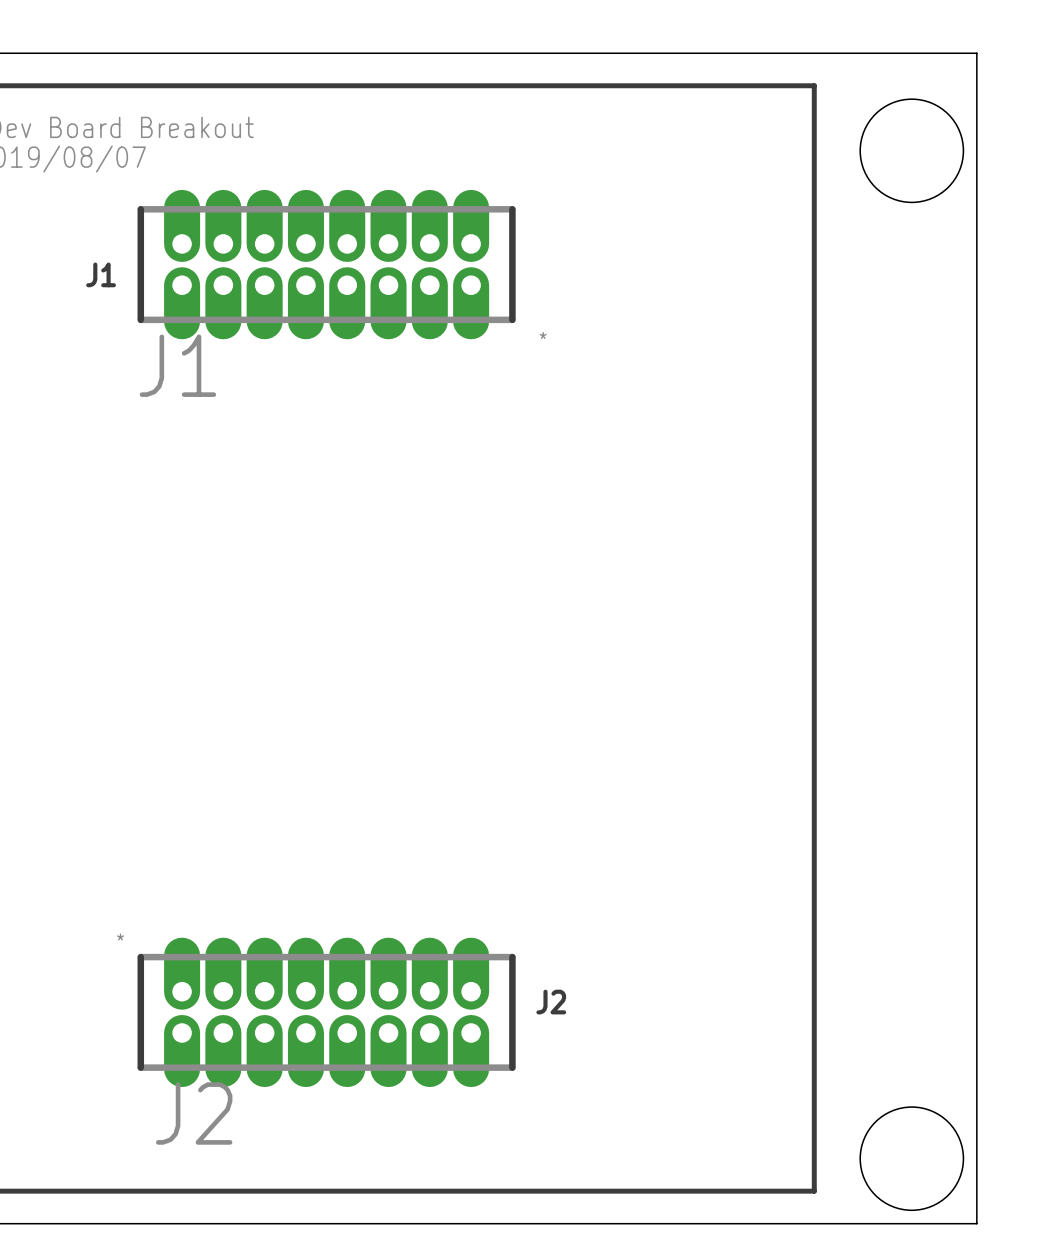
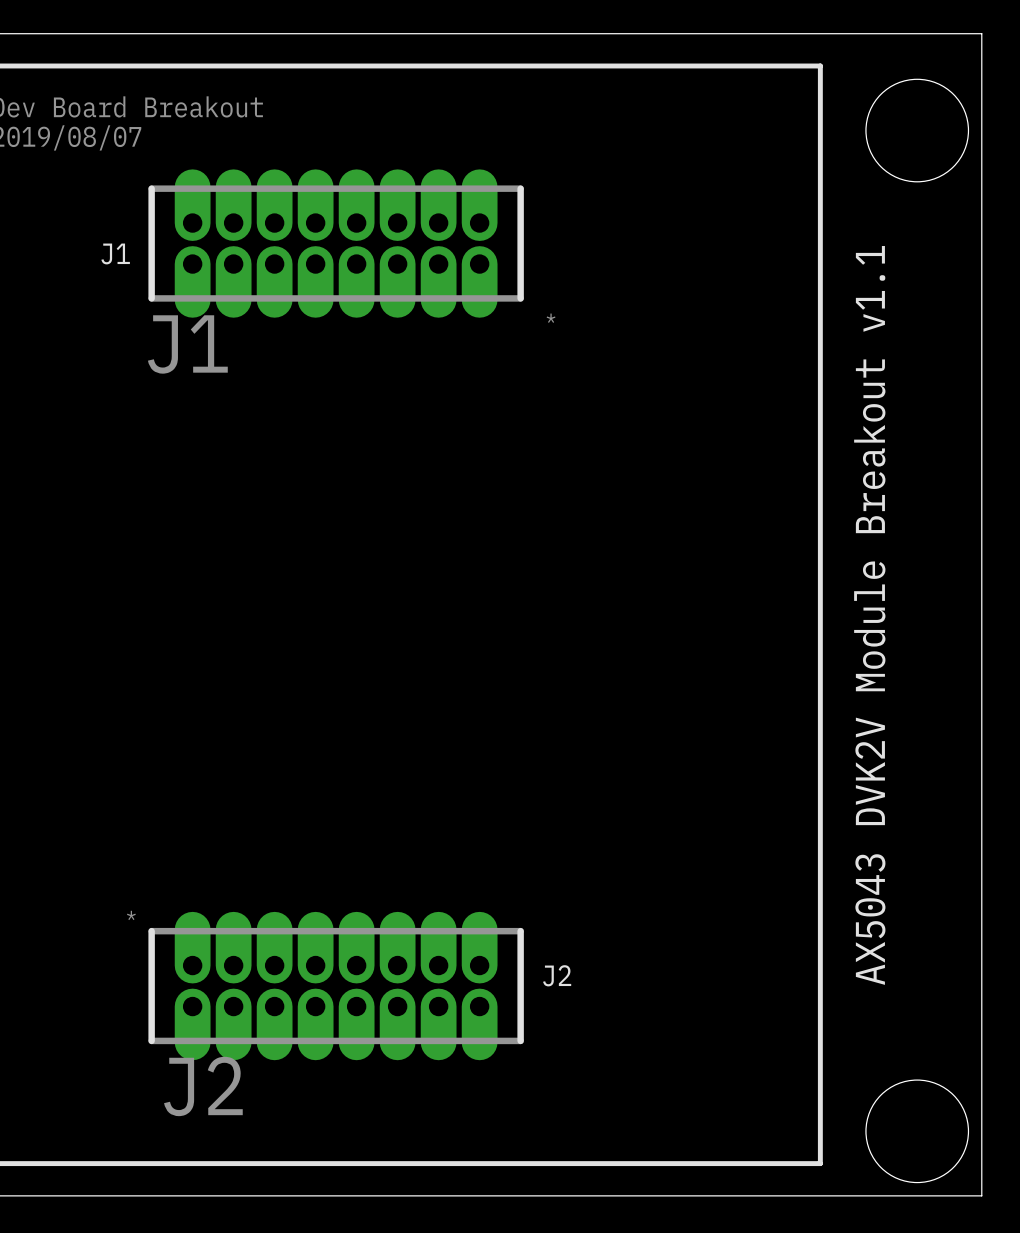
text: none -> AX5043 DVK2V Module Breakout v1.1 (869, 615)

